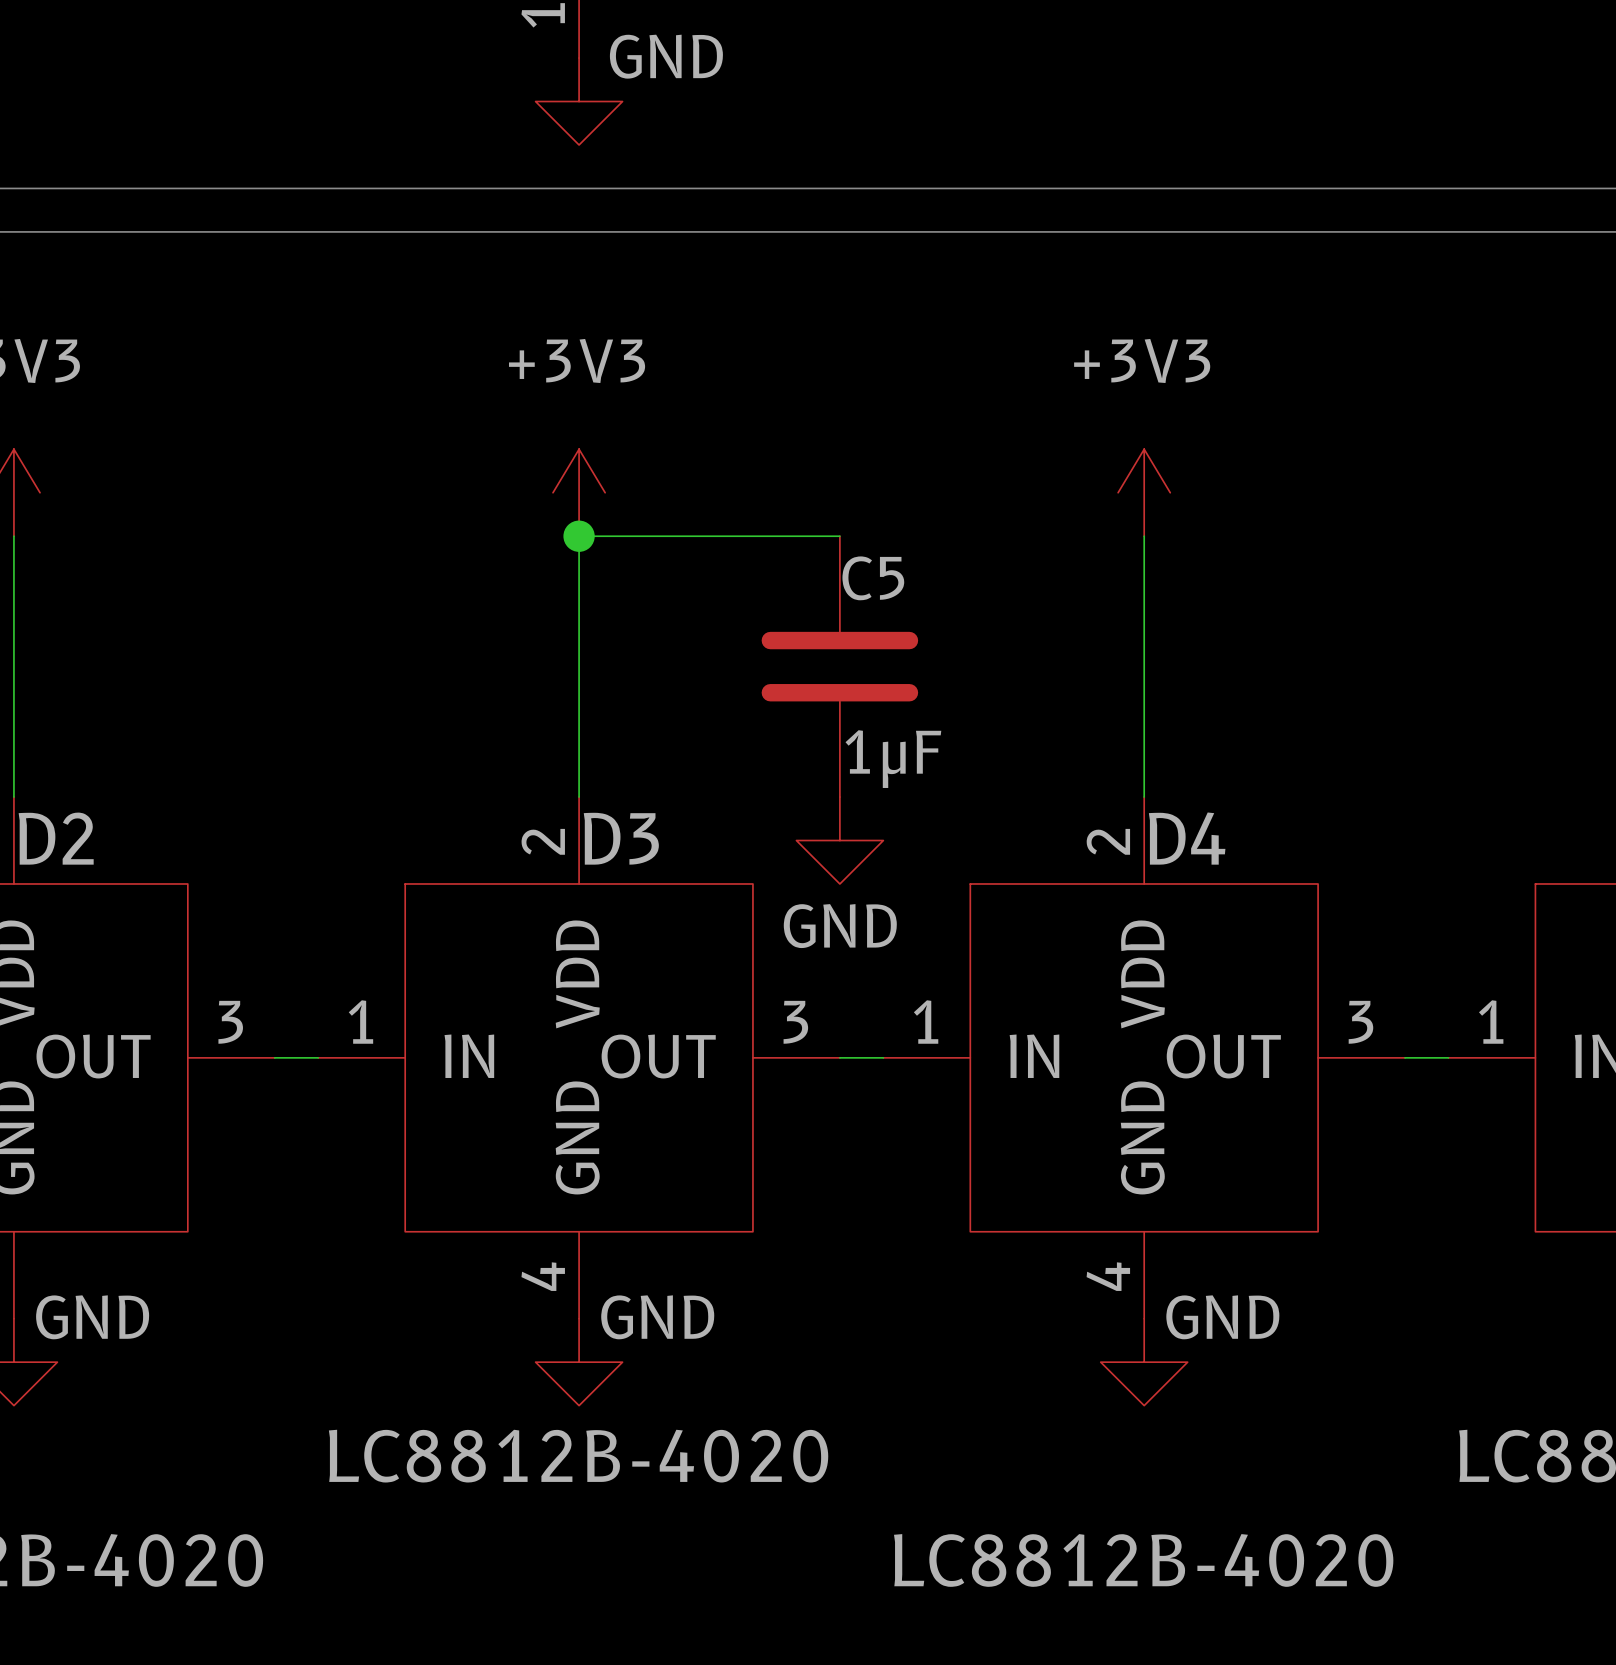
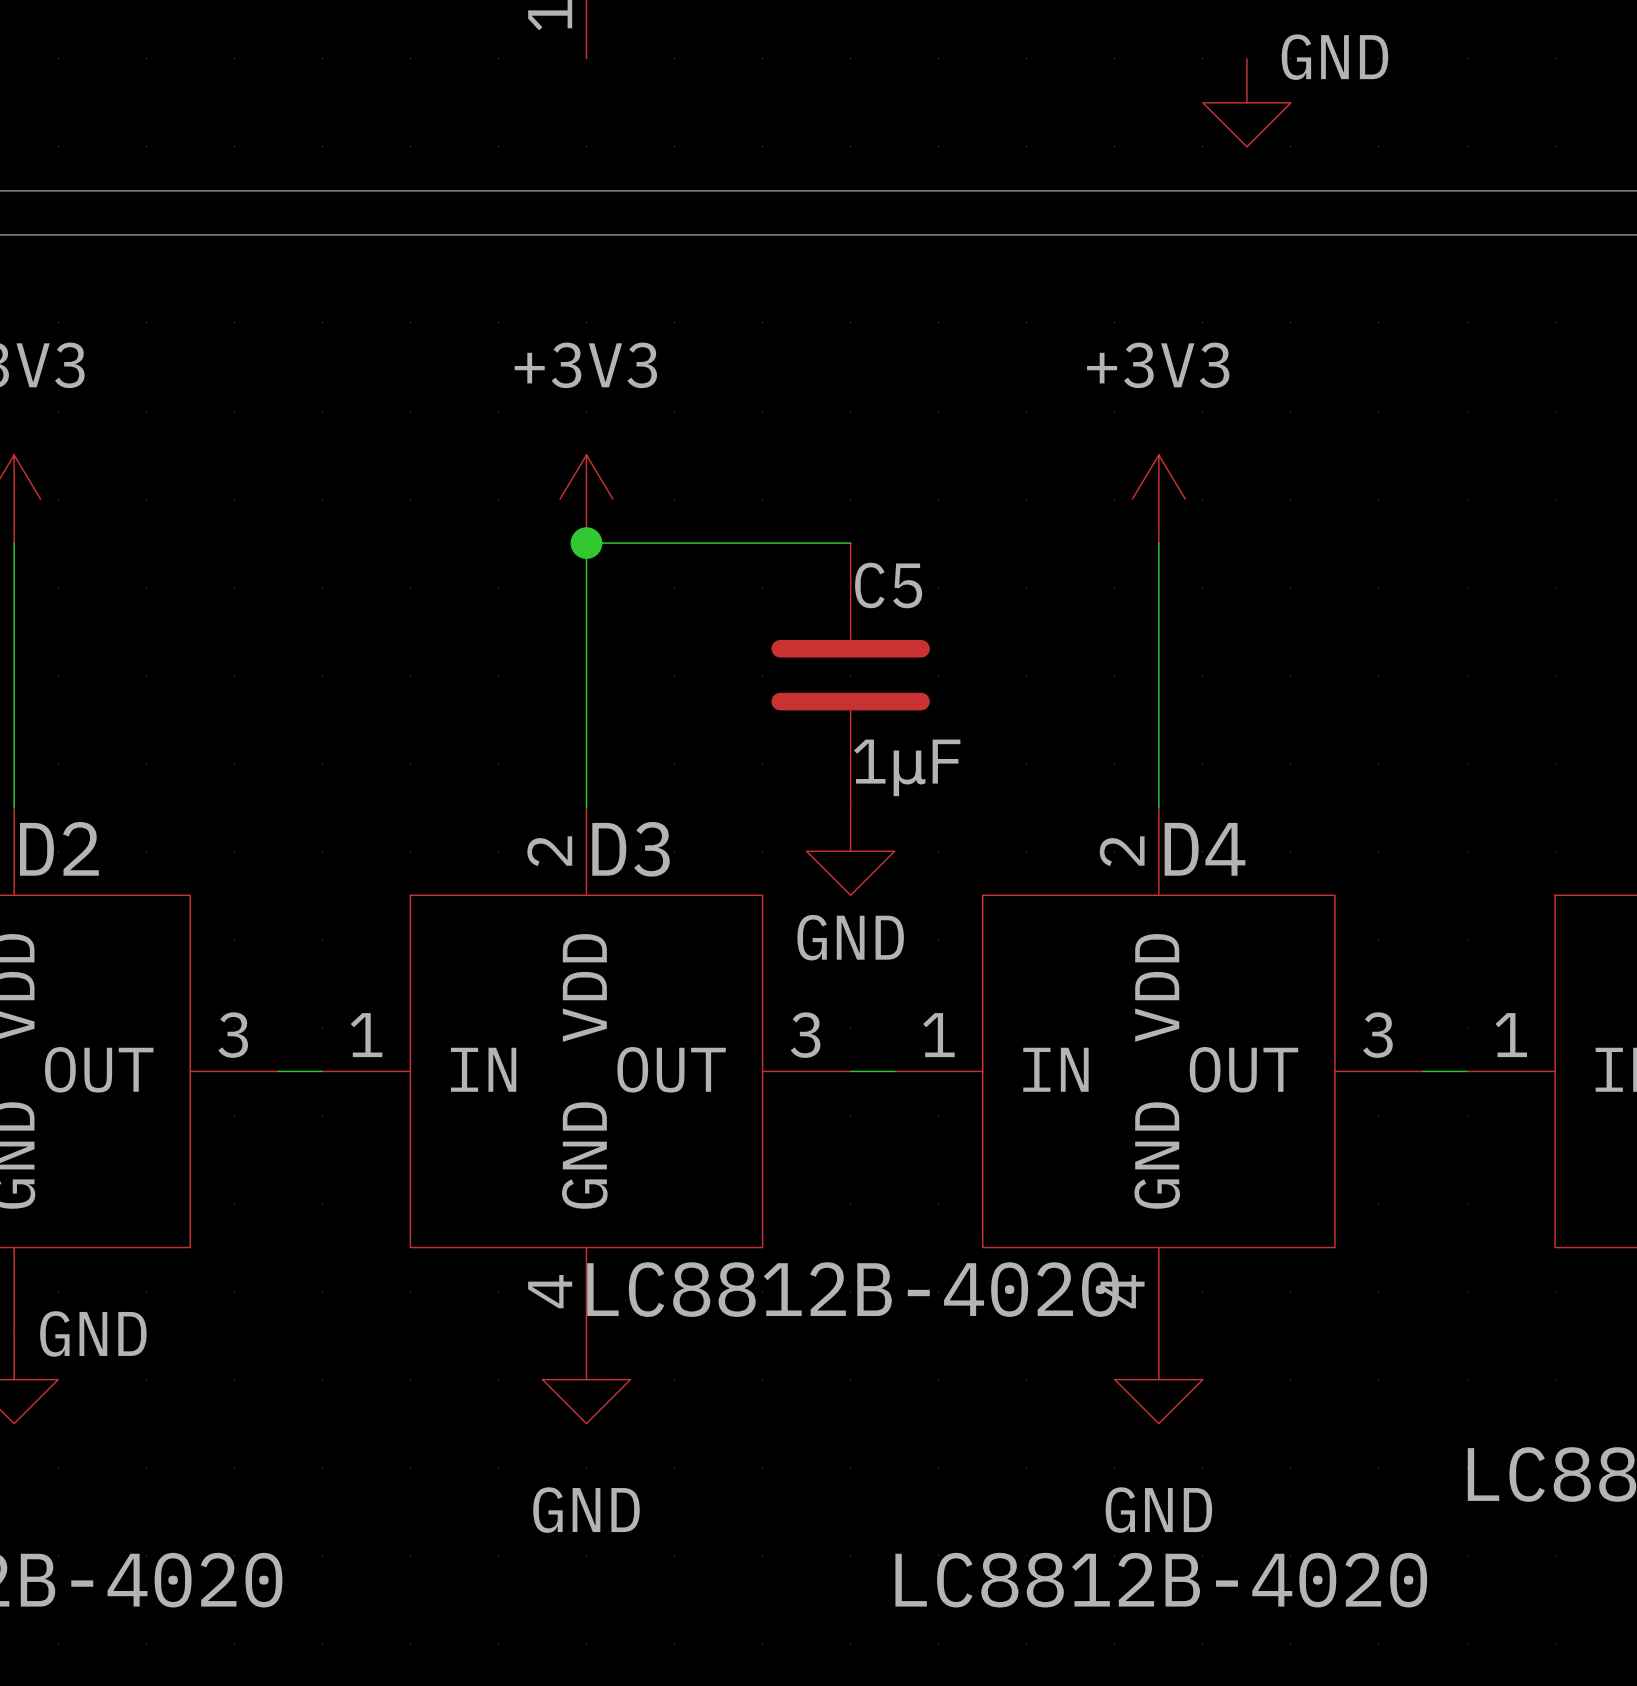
power symbol position: GND (579, 101) -> GND (1246, 102)
power symbol text position: GND (657, 1317) -> GND (586, 1510)
power symbol text position: GND (1222, 1317) -> GND (1158, 1510)
D3 value position: LC8812B-4020 (578, 1456) -> LC8812B-4020 (853, 1289)

